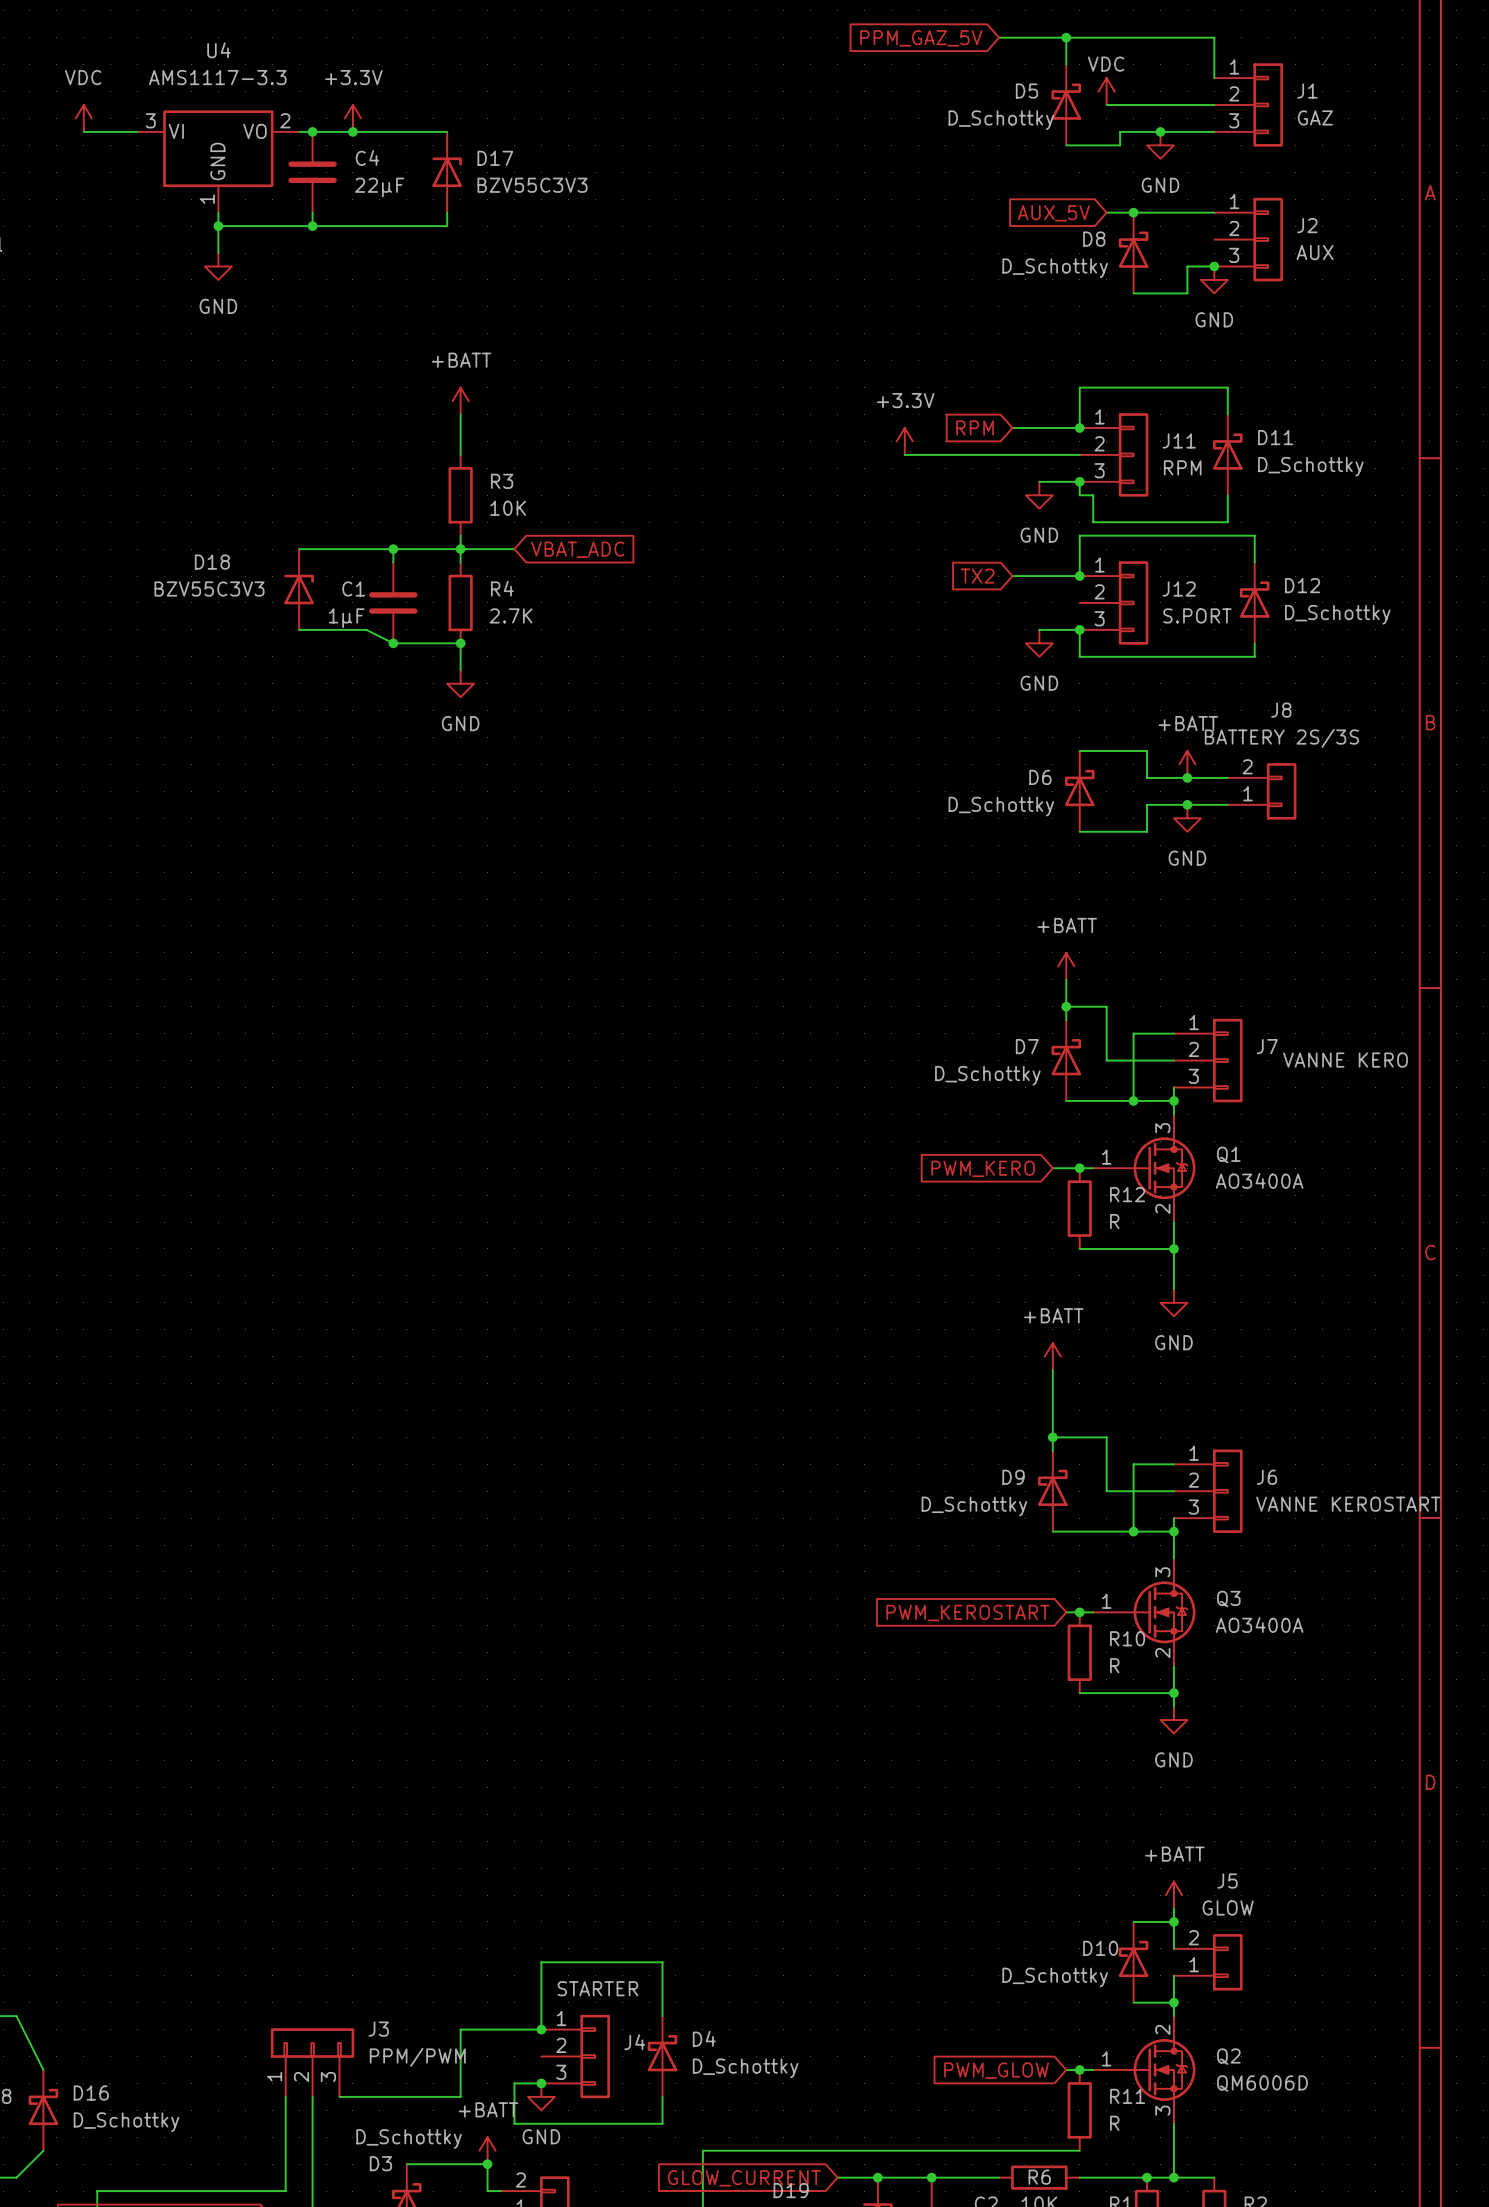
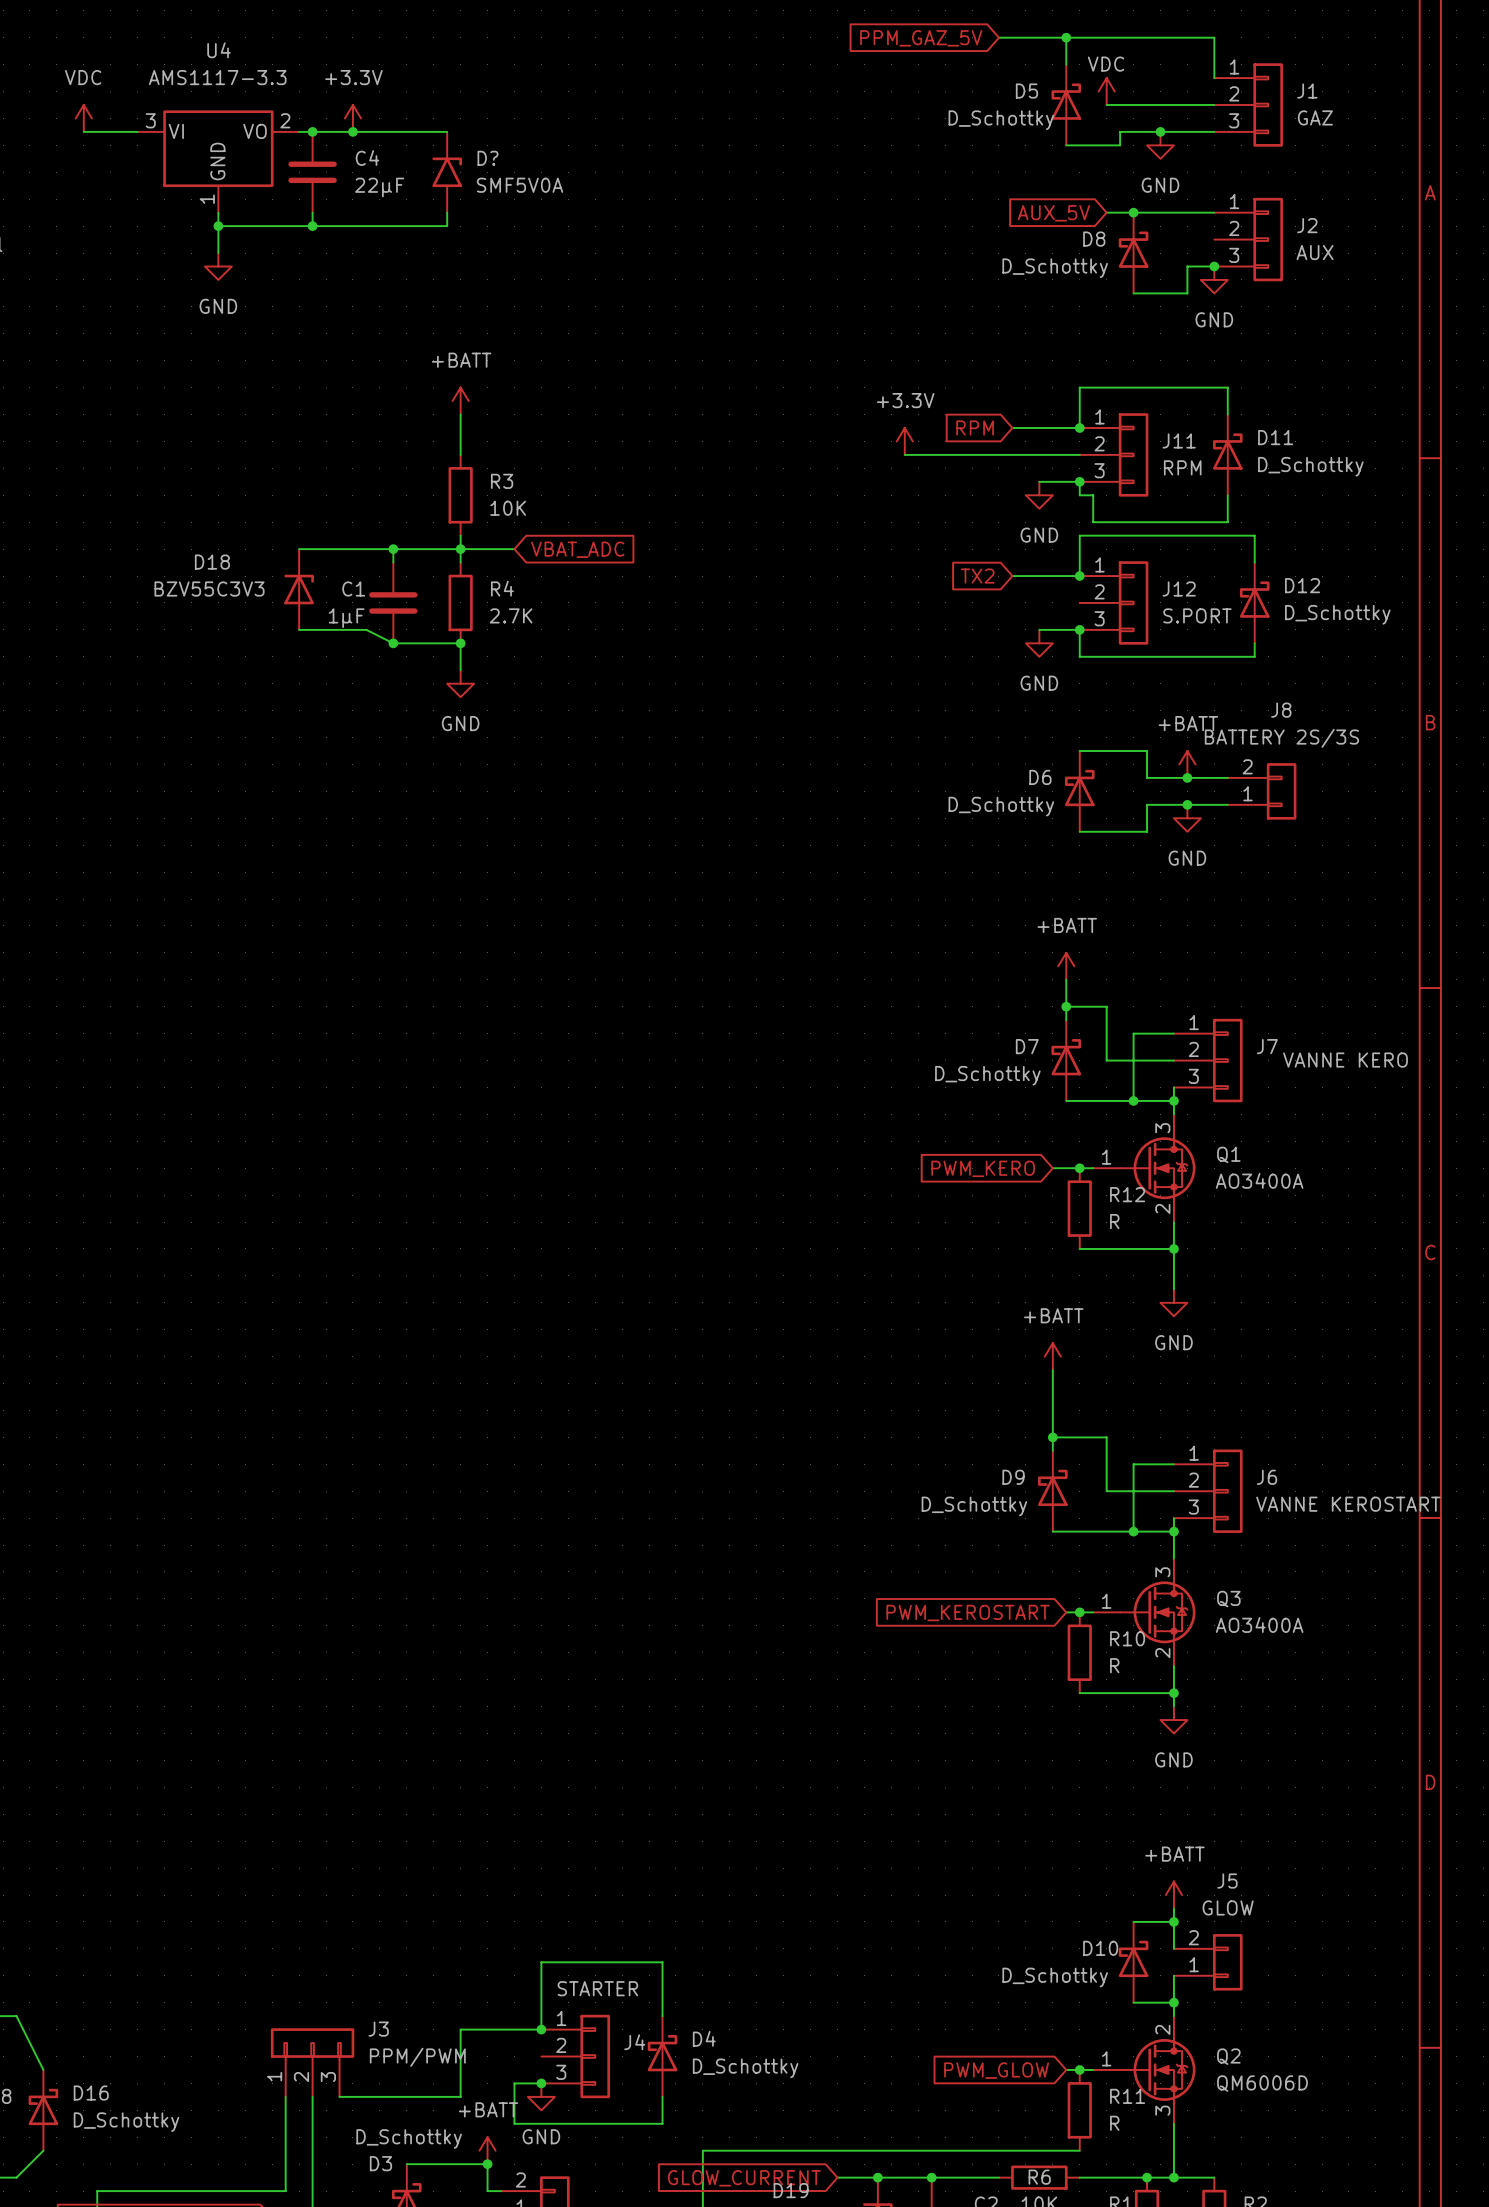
D17: BZV55C3V3 (447, 172) -> none
D?: none -> SMF5V0A (447, 172)

